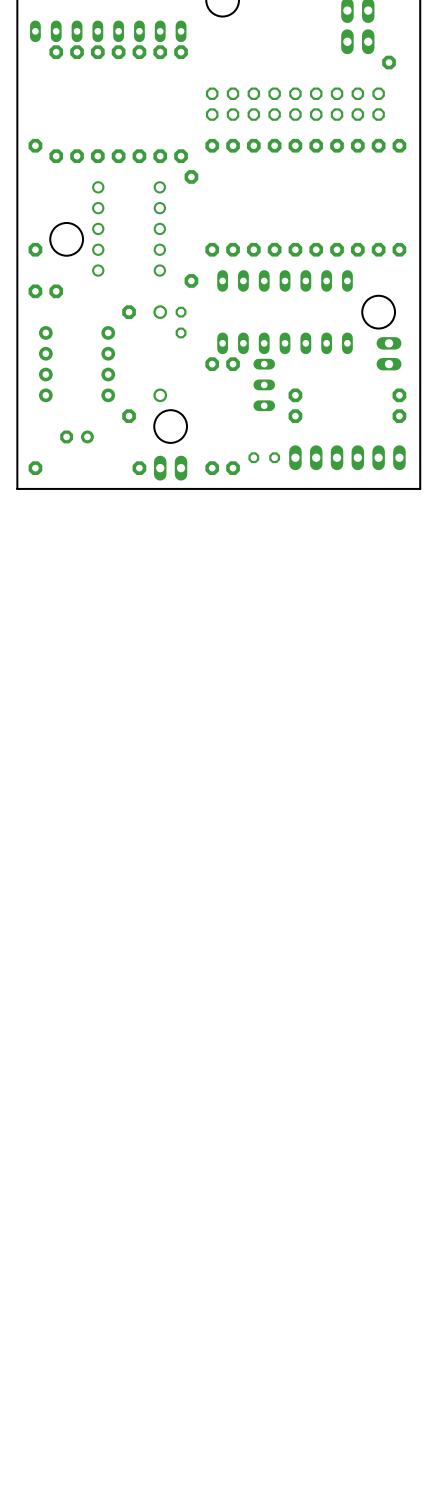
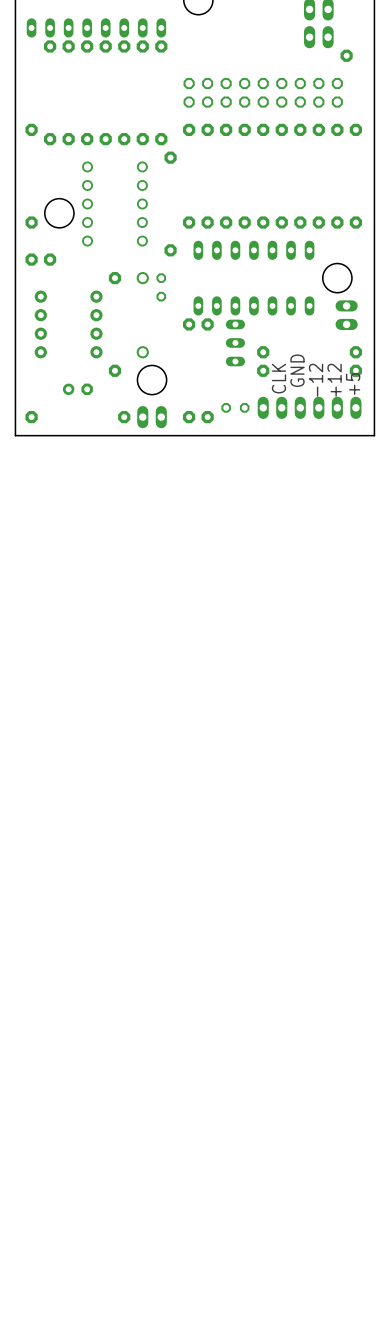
text: none -> GND (297, 370)
text: none -> CLK (278, 378)
text: none -> -12 (316, 380)
text: none -> +12 (334, 380)
text: none -> +5 (353, 383)
part rotation: 0° (77, 436) -> 180° (77, 389)

